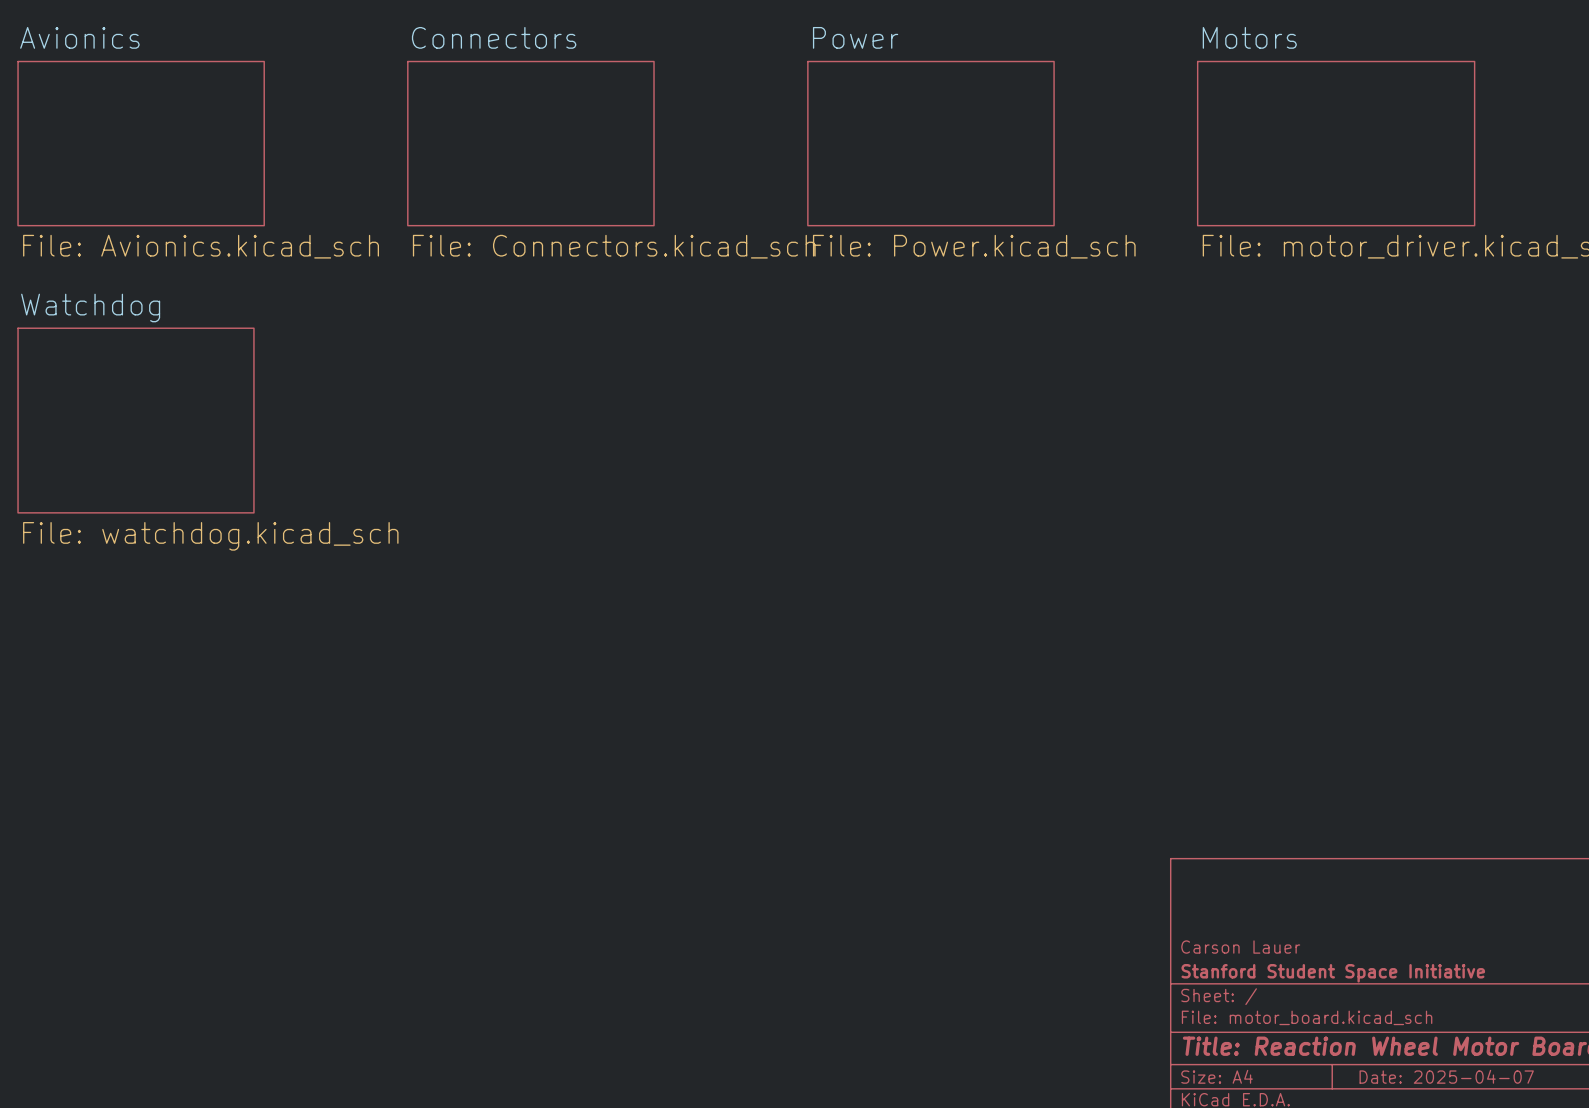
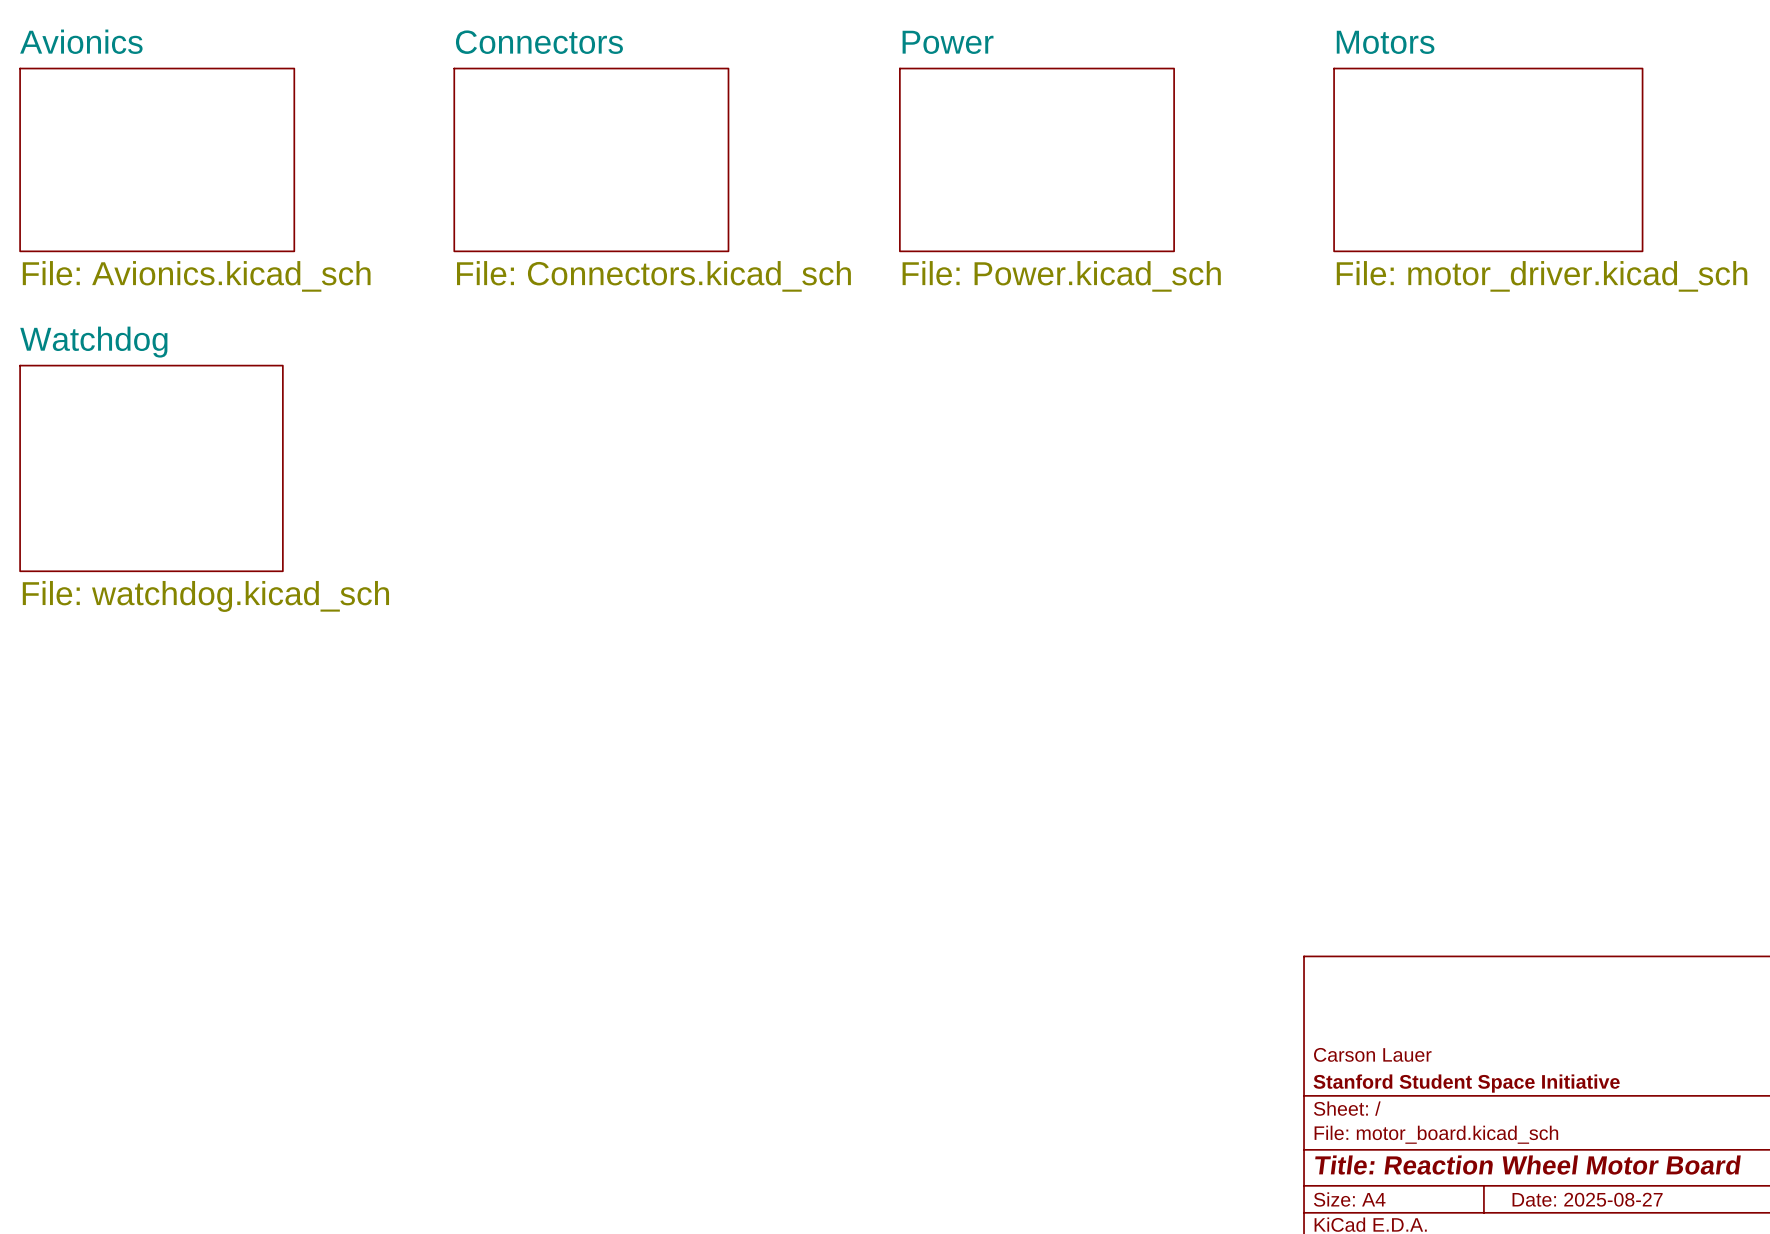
title block: Date: 2025-04-07 (1446, 1076) -> Date: 2025-08-27 (1587, 1199)

